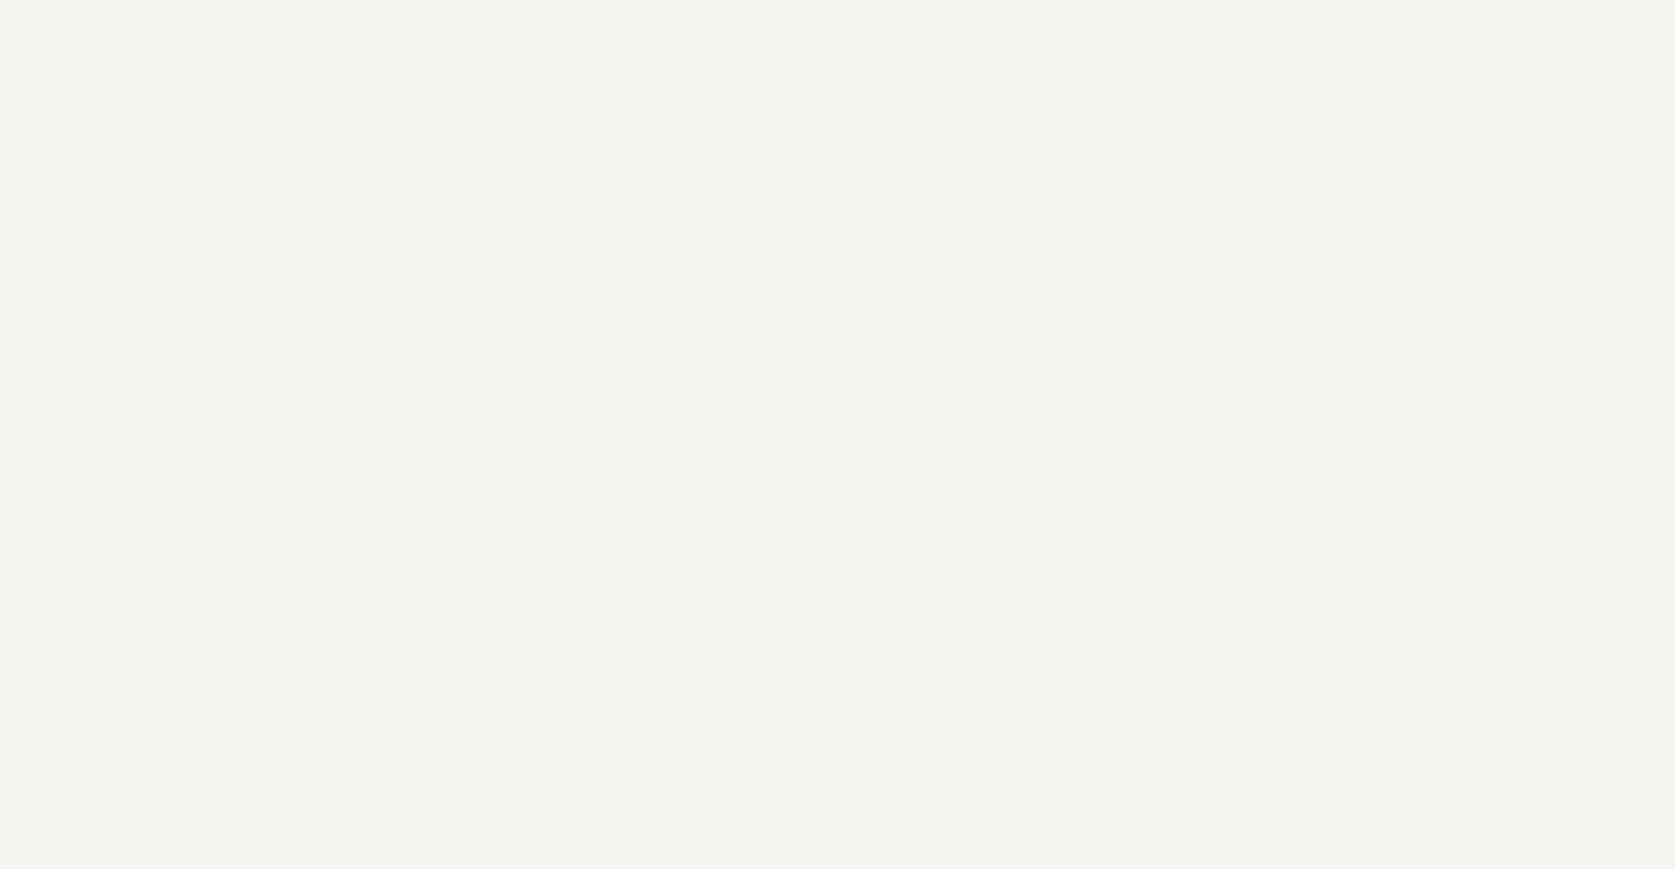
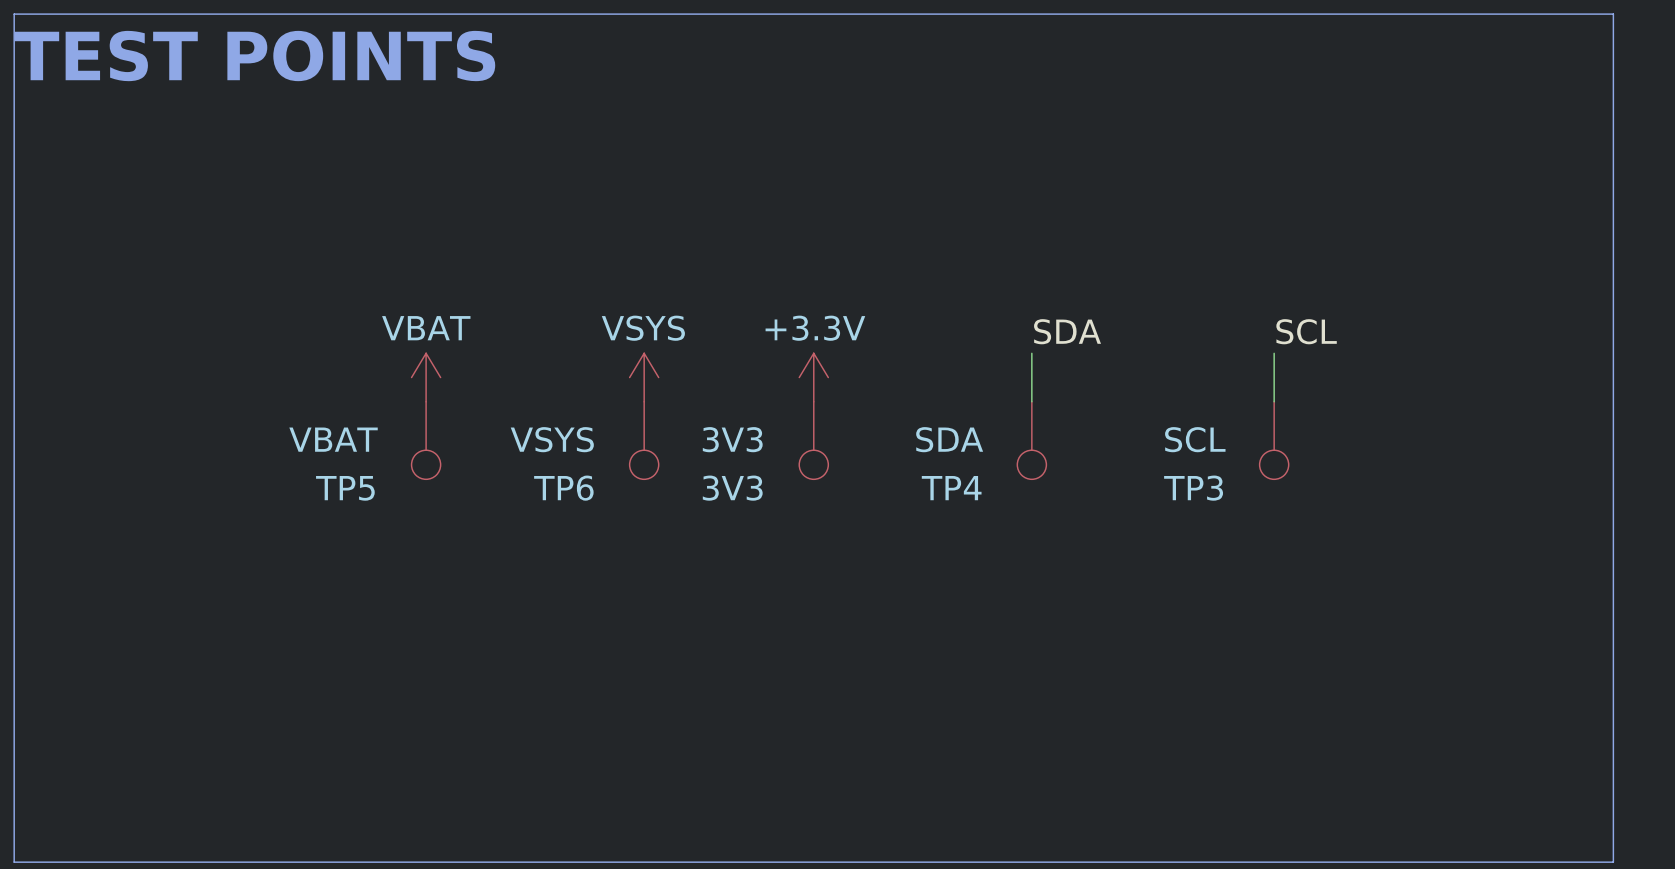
line: none -> (14, 14) (1613, 14) (1613, 862) (14, 862) (14, 14)
text: none -> TEST POINTS (254, 56)
label: none -> SDA (1067, 331)
label: none -> SCL (1306, 331)
wire: none -> (1031, 353) (1031, 401)
wire: none -> (1274, 353) (1274, 401)
power symbol: none -> VBAT (426, 377)
power symbol: none -> VSYS (644, 377)
power symbol: none -> +3.3V (813, 377)
TP5: none -> VBAT (426, 440)
TP6: none -> VSYS (644, 440)
3V3: none -> 3V3 (813, 440)
TP4: none -> SDA (1031, 440)
TP3: none -> SCL (1274, 440)

